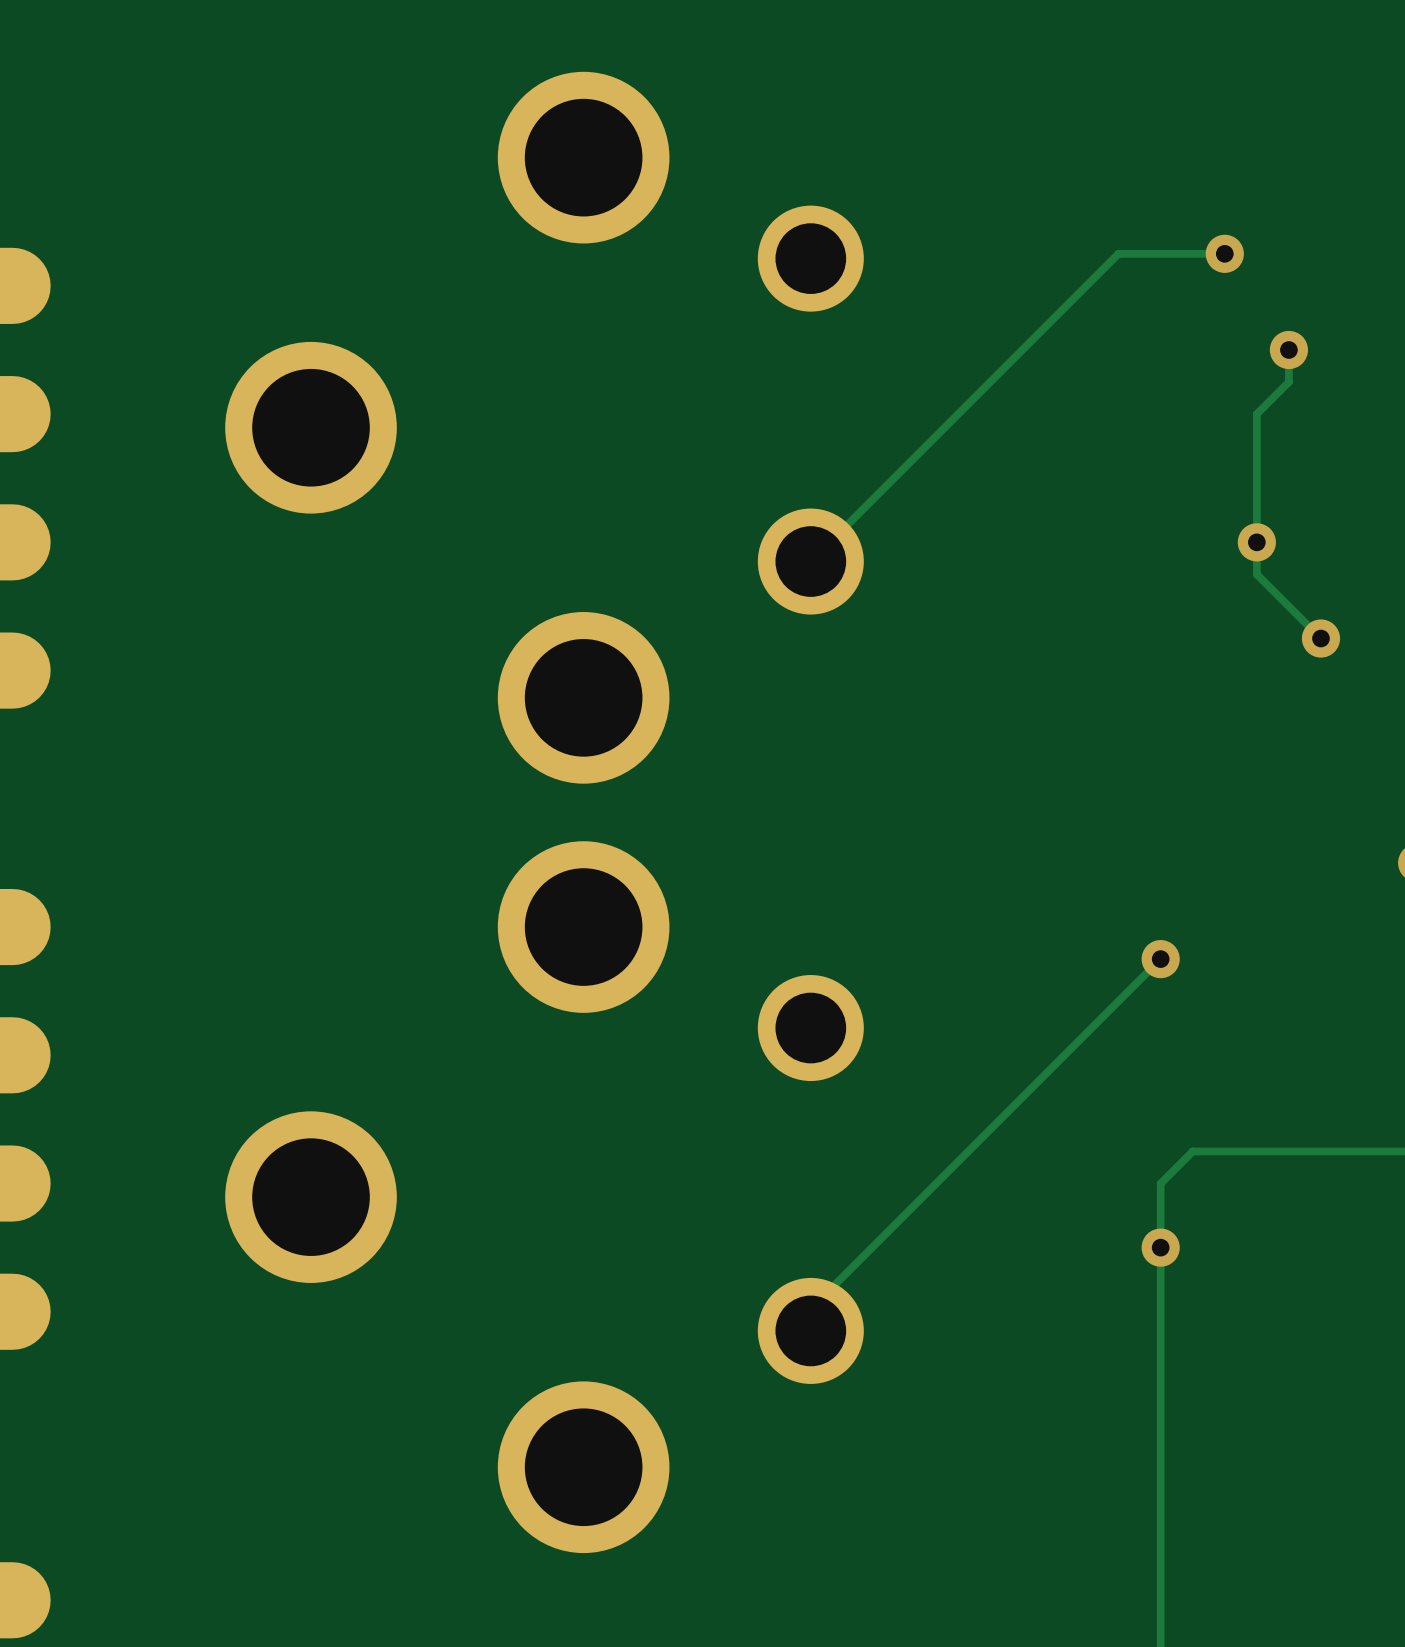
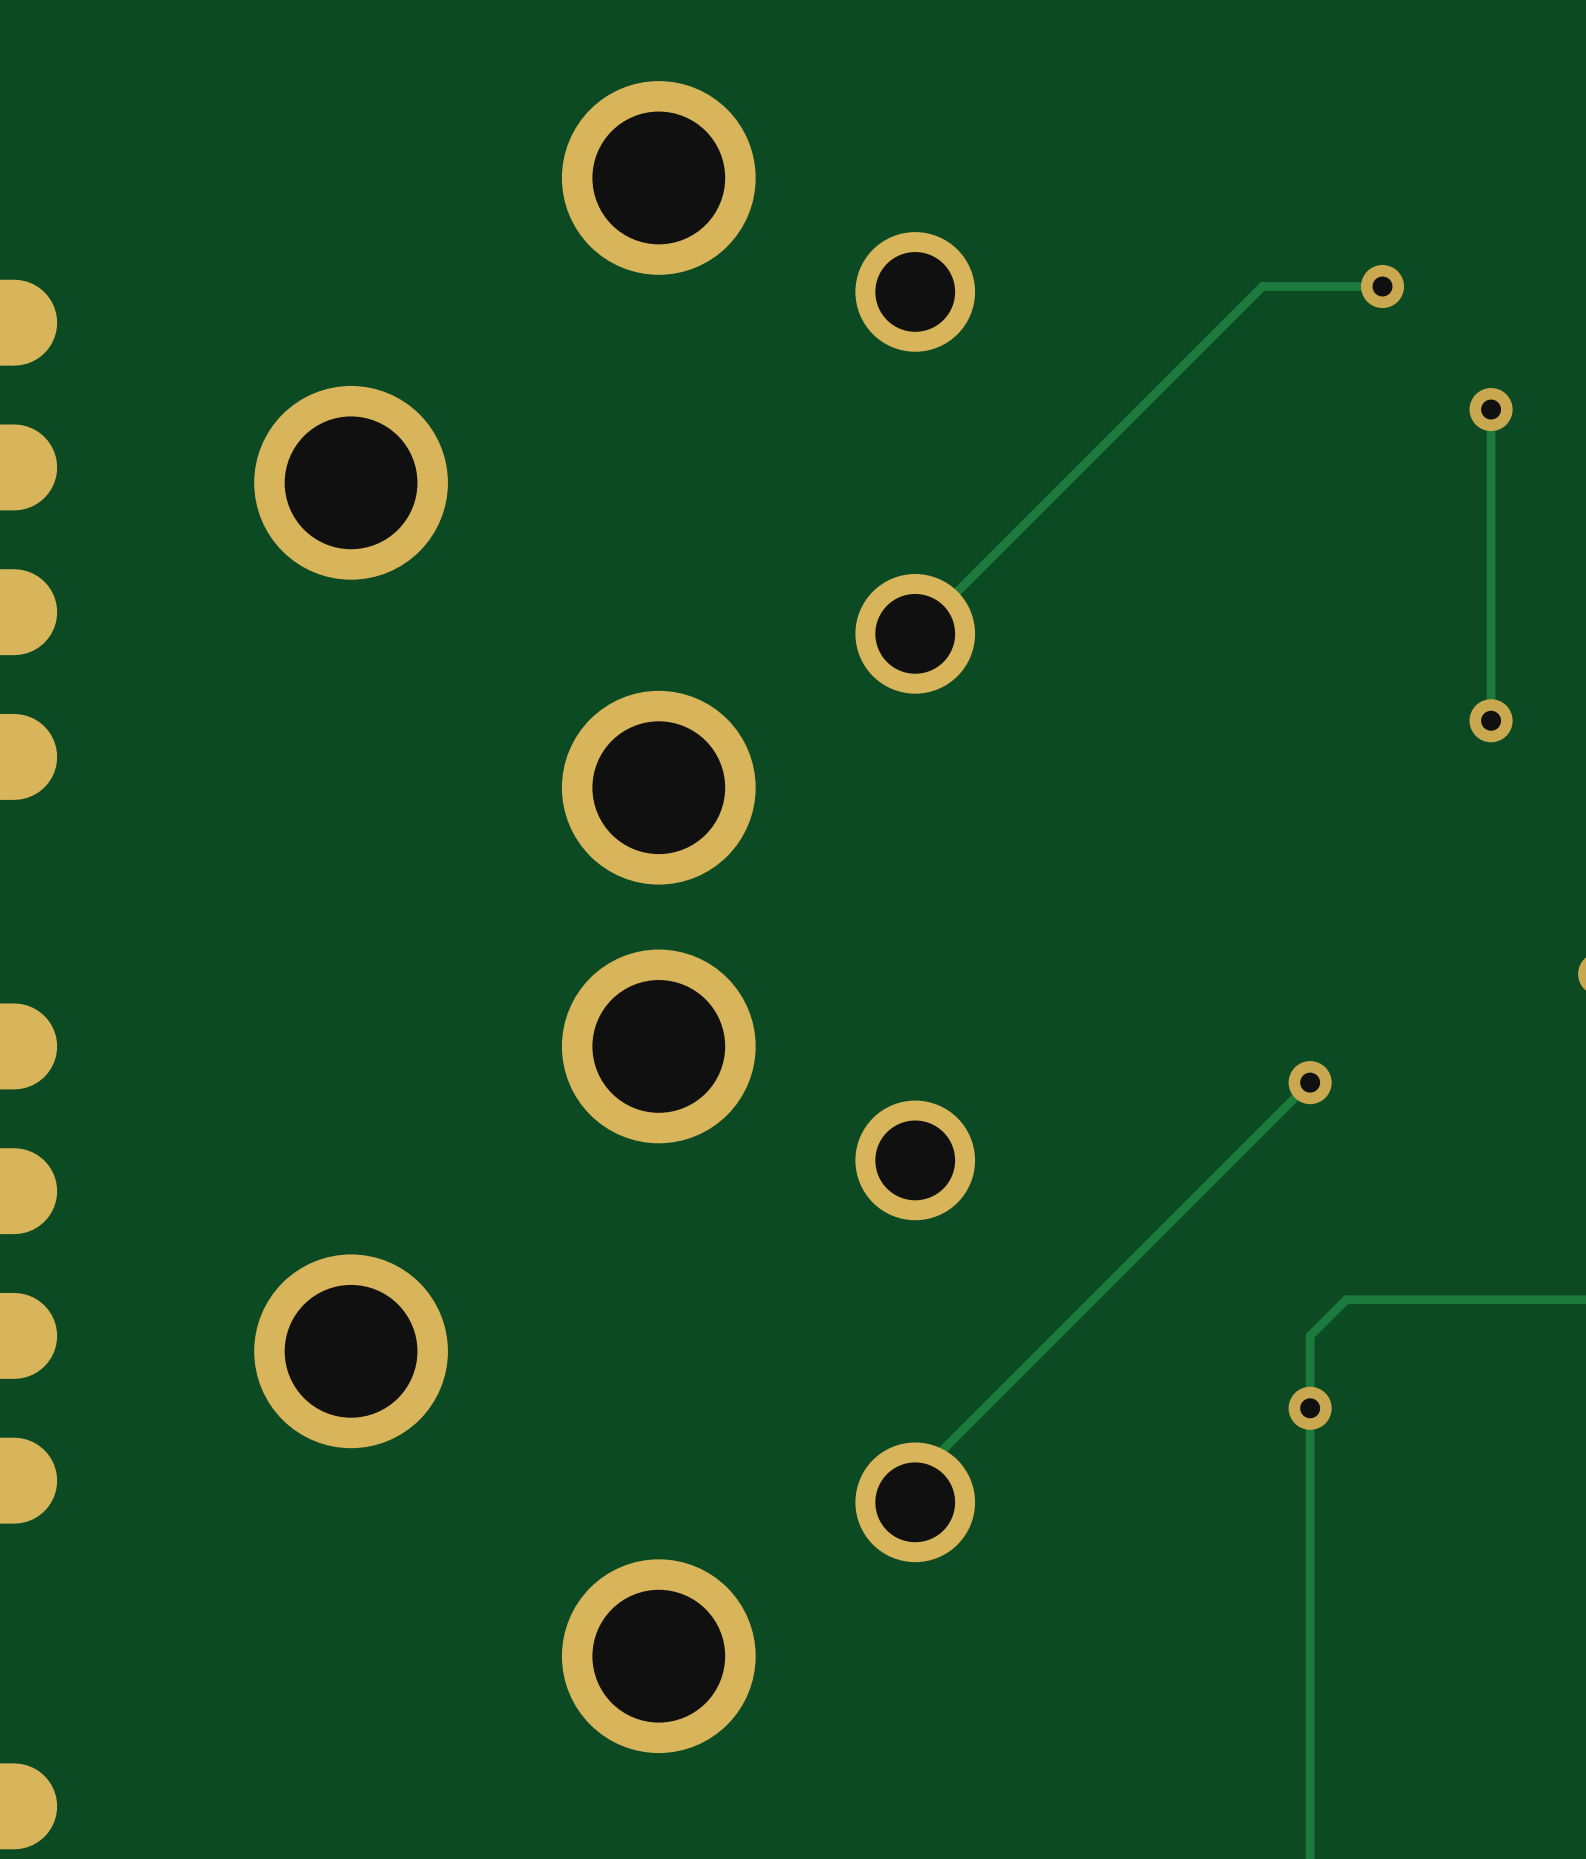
track: (1288, 350) (1288, 382) (1256, 414) (1256, 574) (1320, 638) -> none
via position: (1288, 350) -> (1491, 409)
track: none -> (1491, 409) (1491, 717)
via: (1256, 542) -> none

